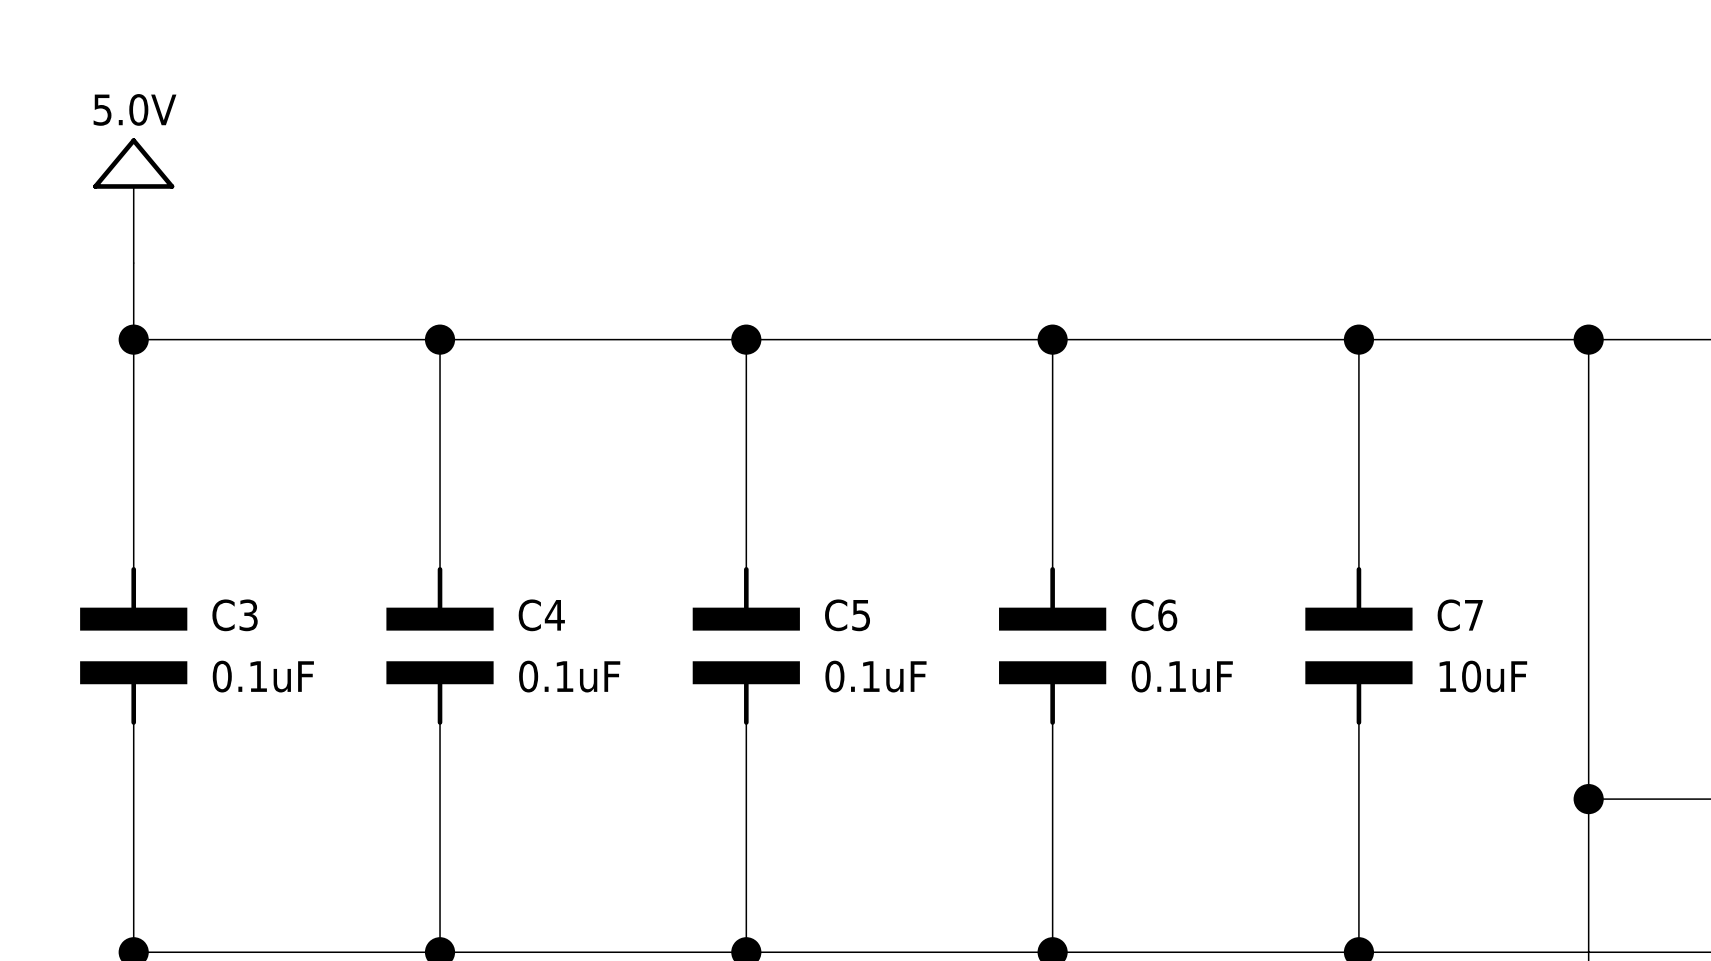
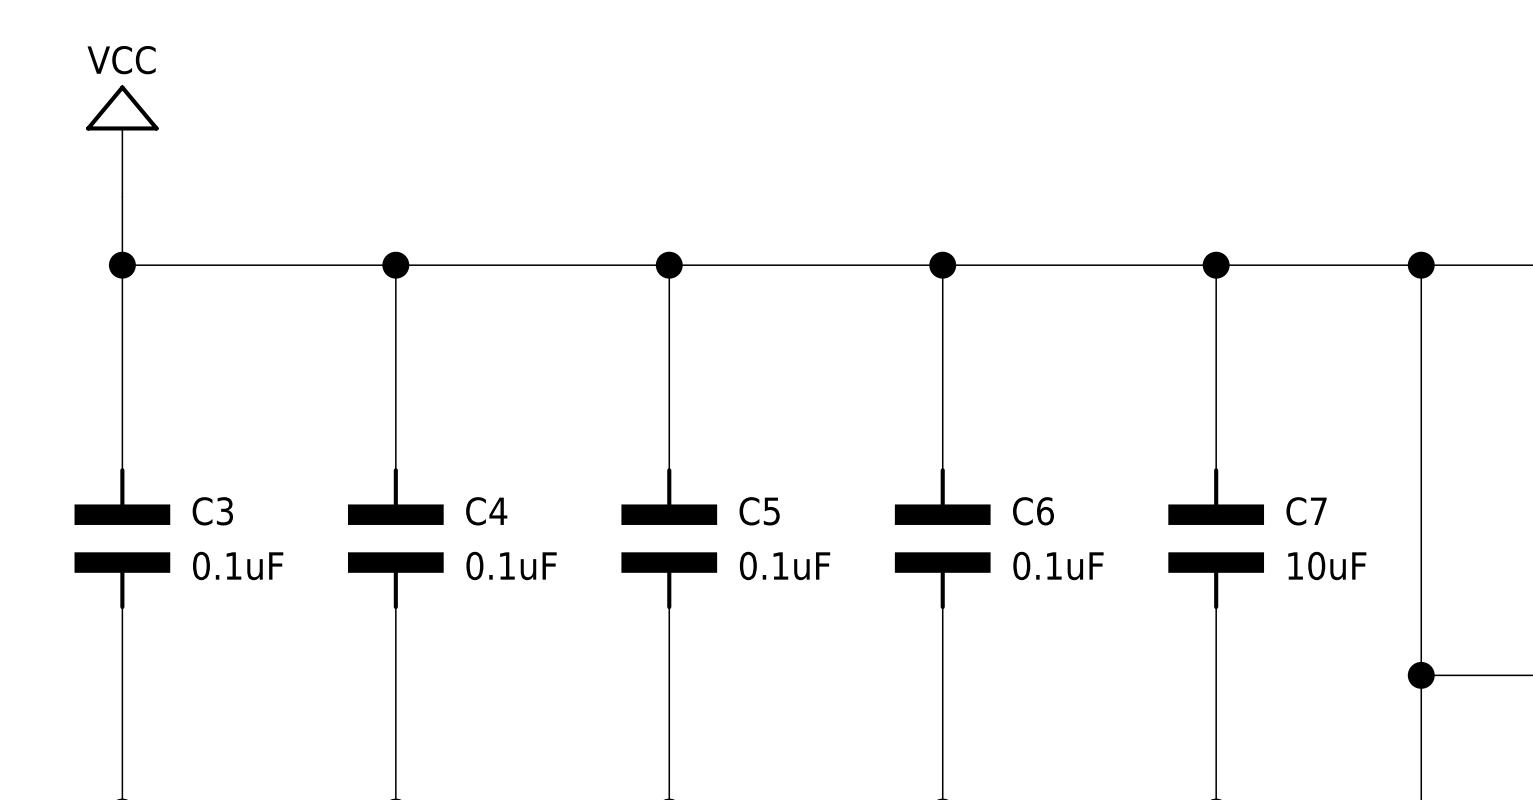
power symbol: 5.0V (133, 200) -> VCC (122, 141)

